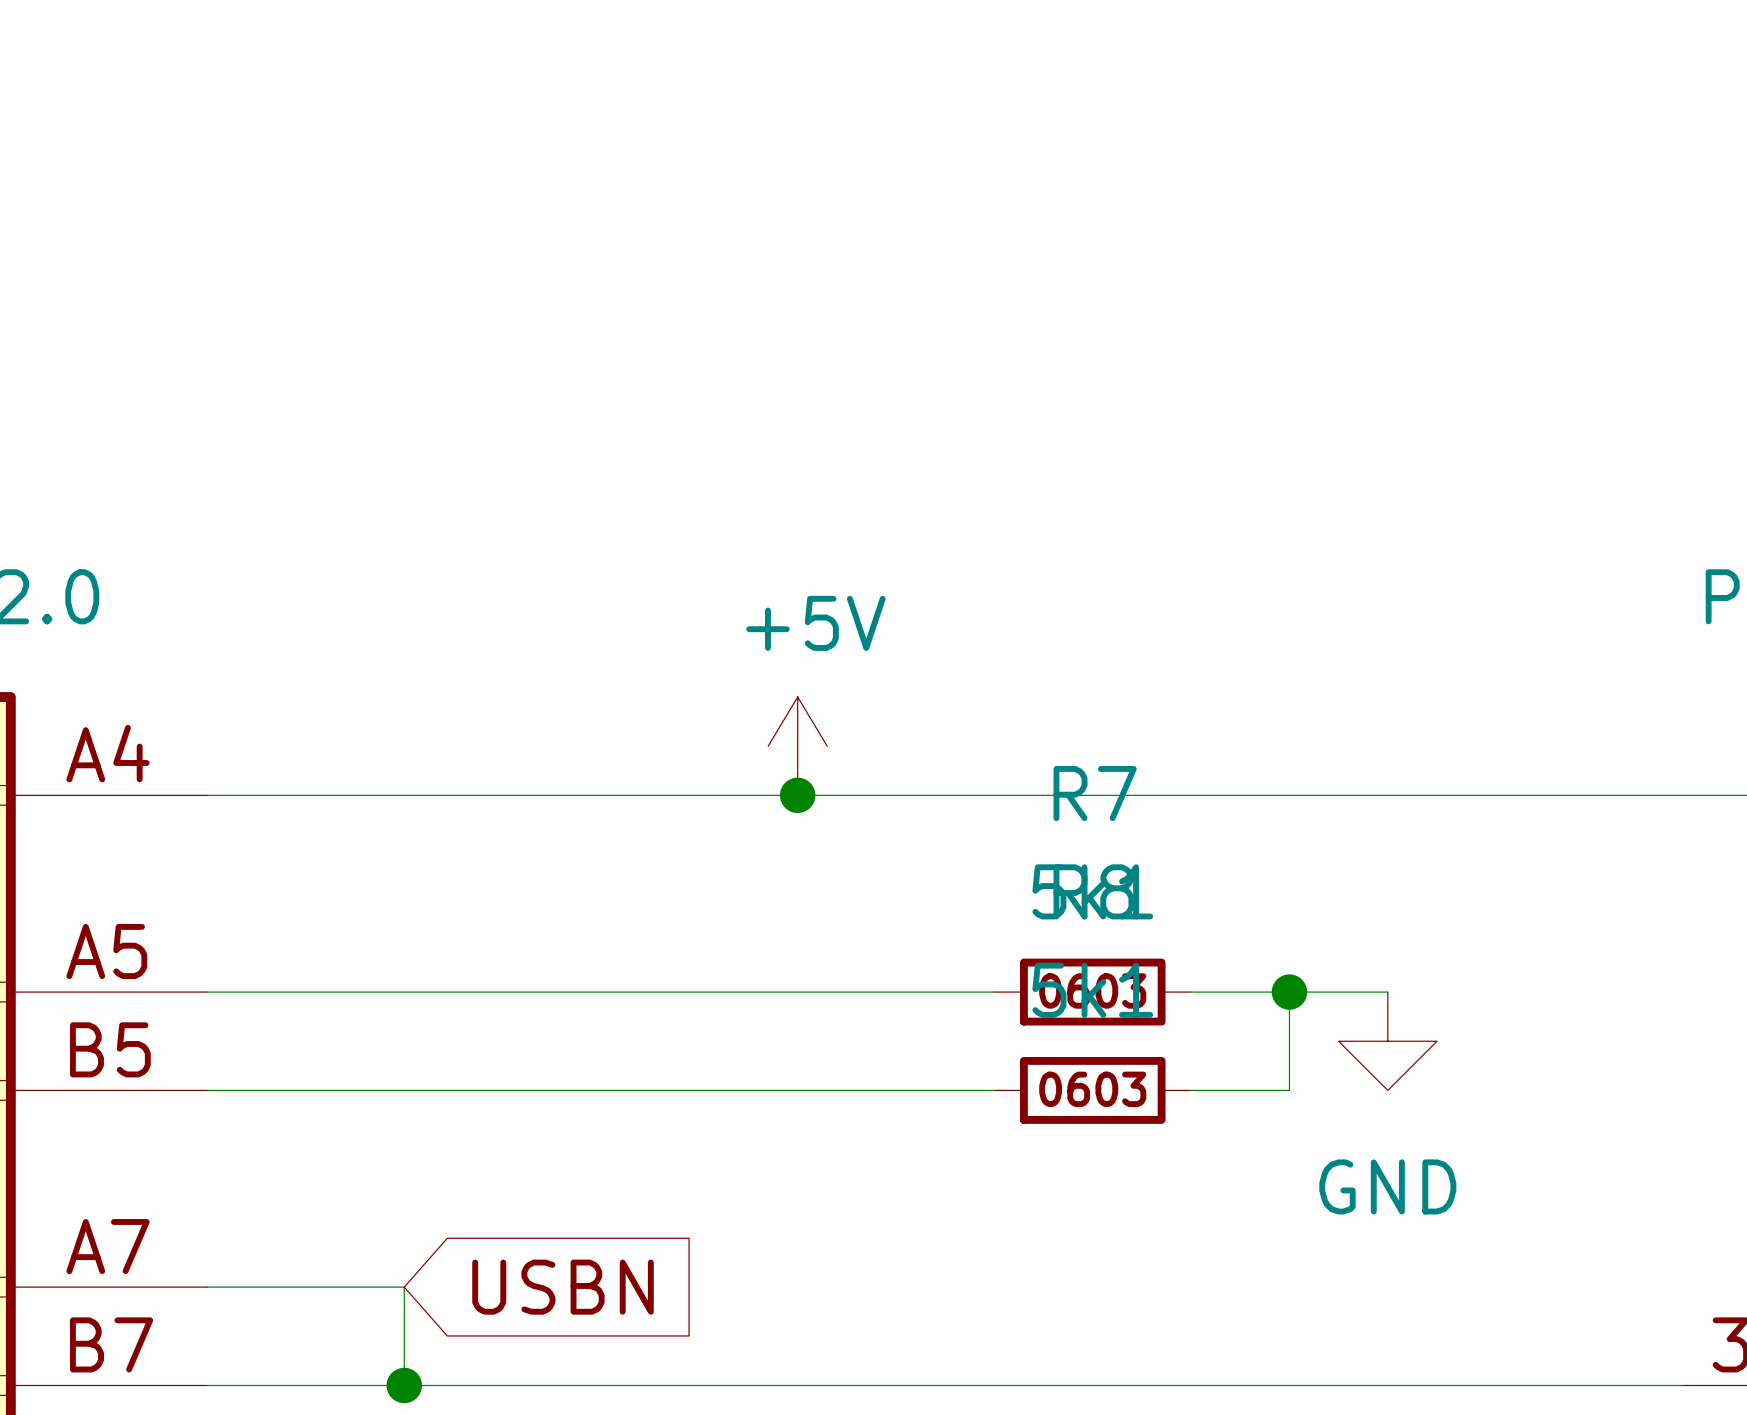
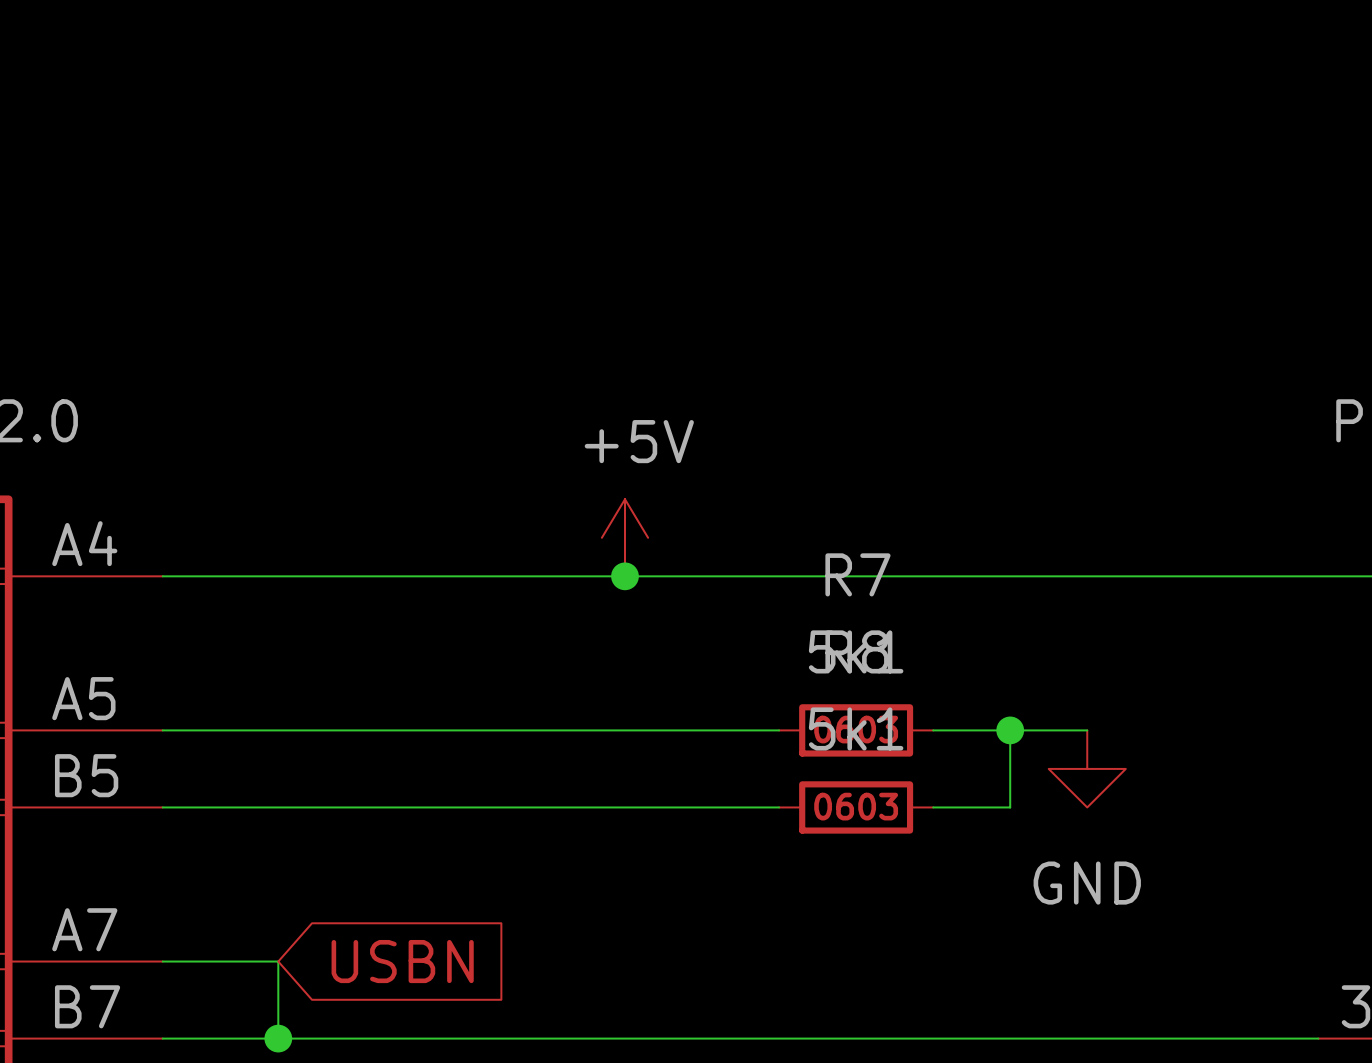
wire: (355, 1287) (404, 1287) (404, 1385) -> (278, 961) (278, 1038)
global label position: USBN (563, 1287) -> USBN (402, 961)
junction position: (404, 1385) -> (278, 1038)

